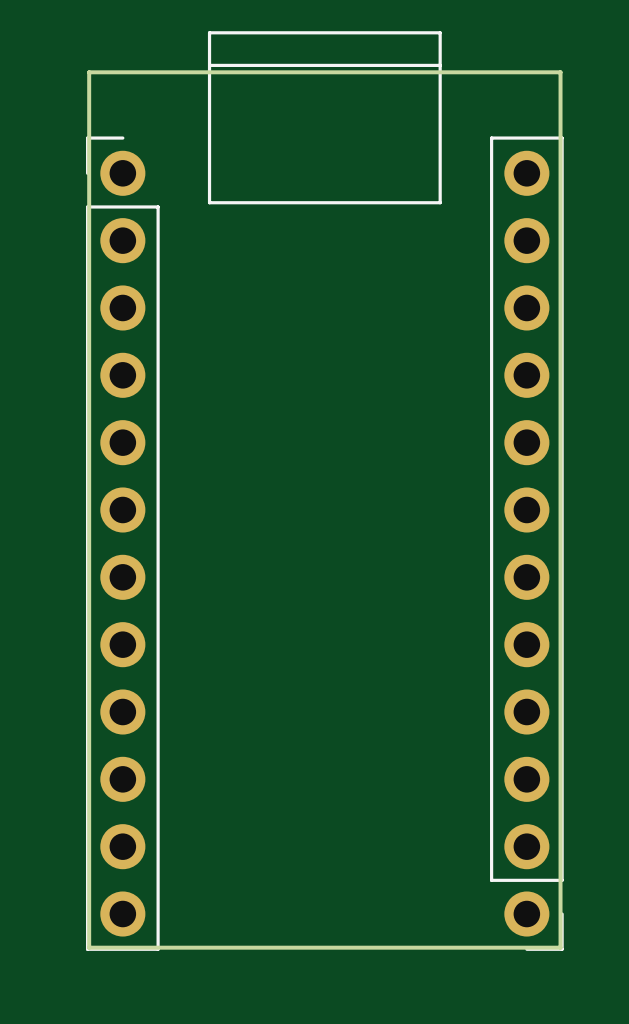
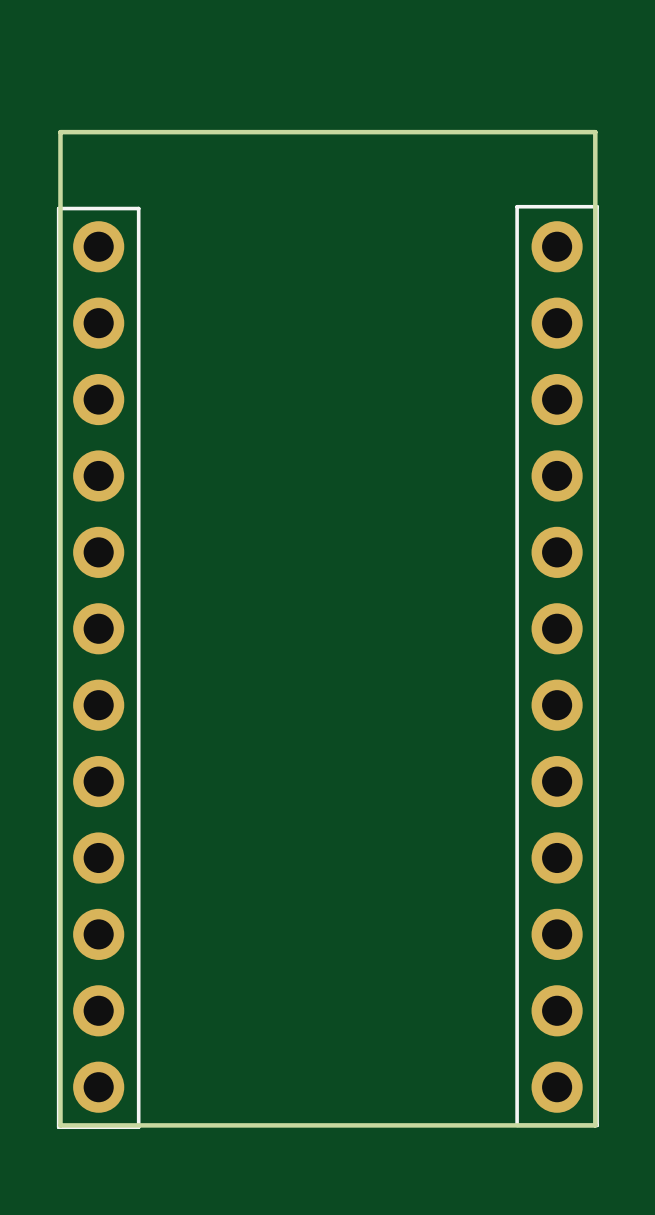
drawing: [207, 31, 442, 205] -> none
part footprint: [85, 136, 160, 951] -> [56, 206, 141, 1130]
part footprint: [490, 136, 564, 951] -> [515, 204, 599, 1128]

